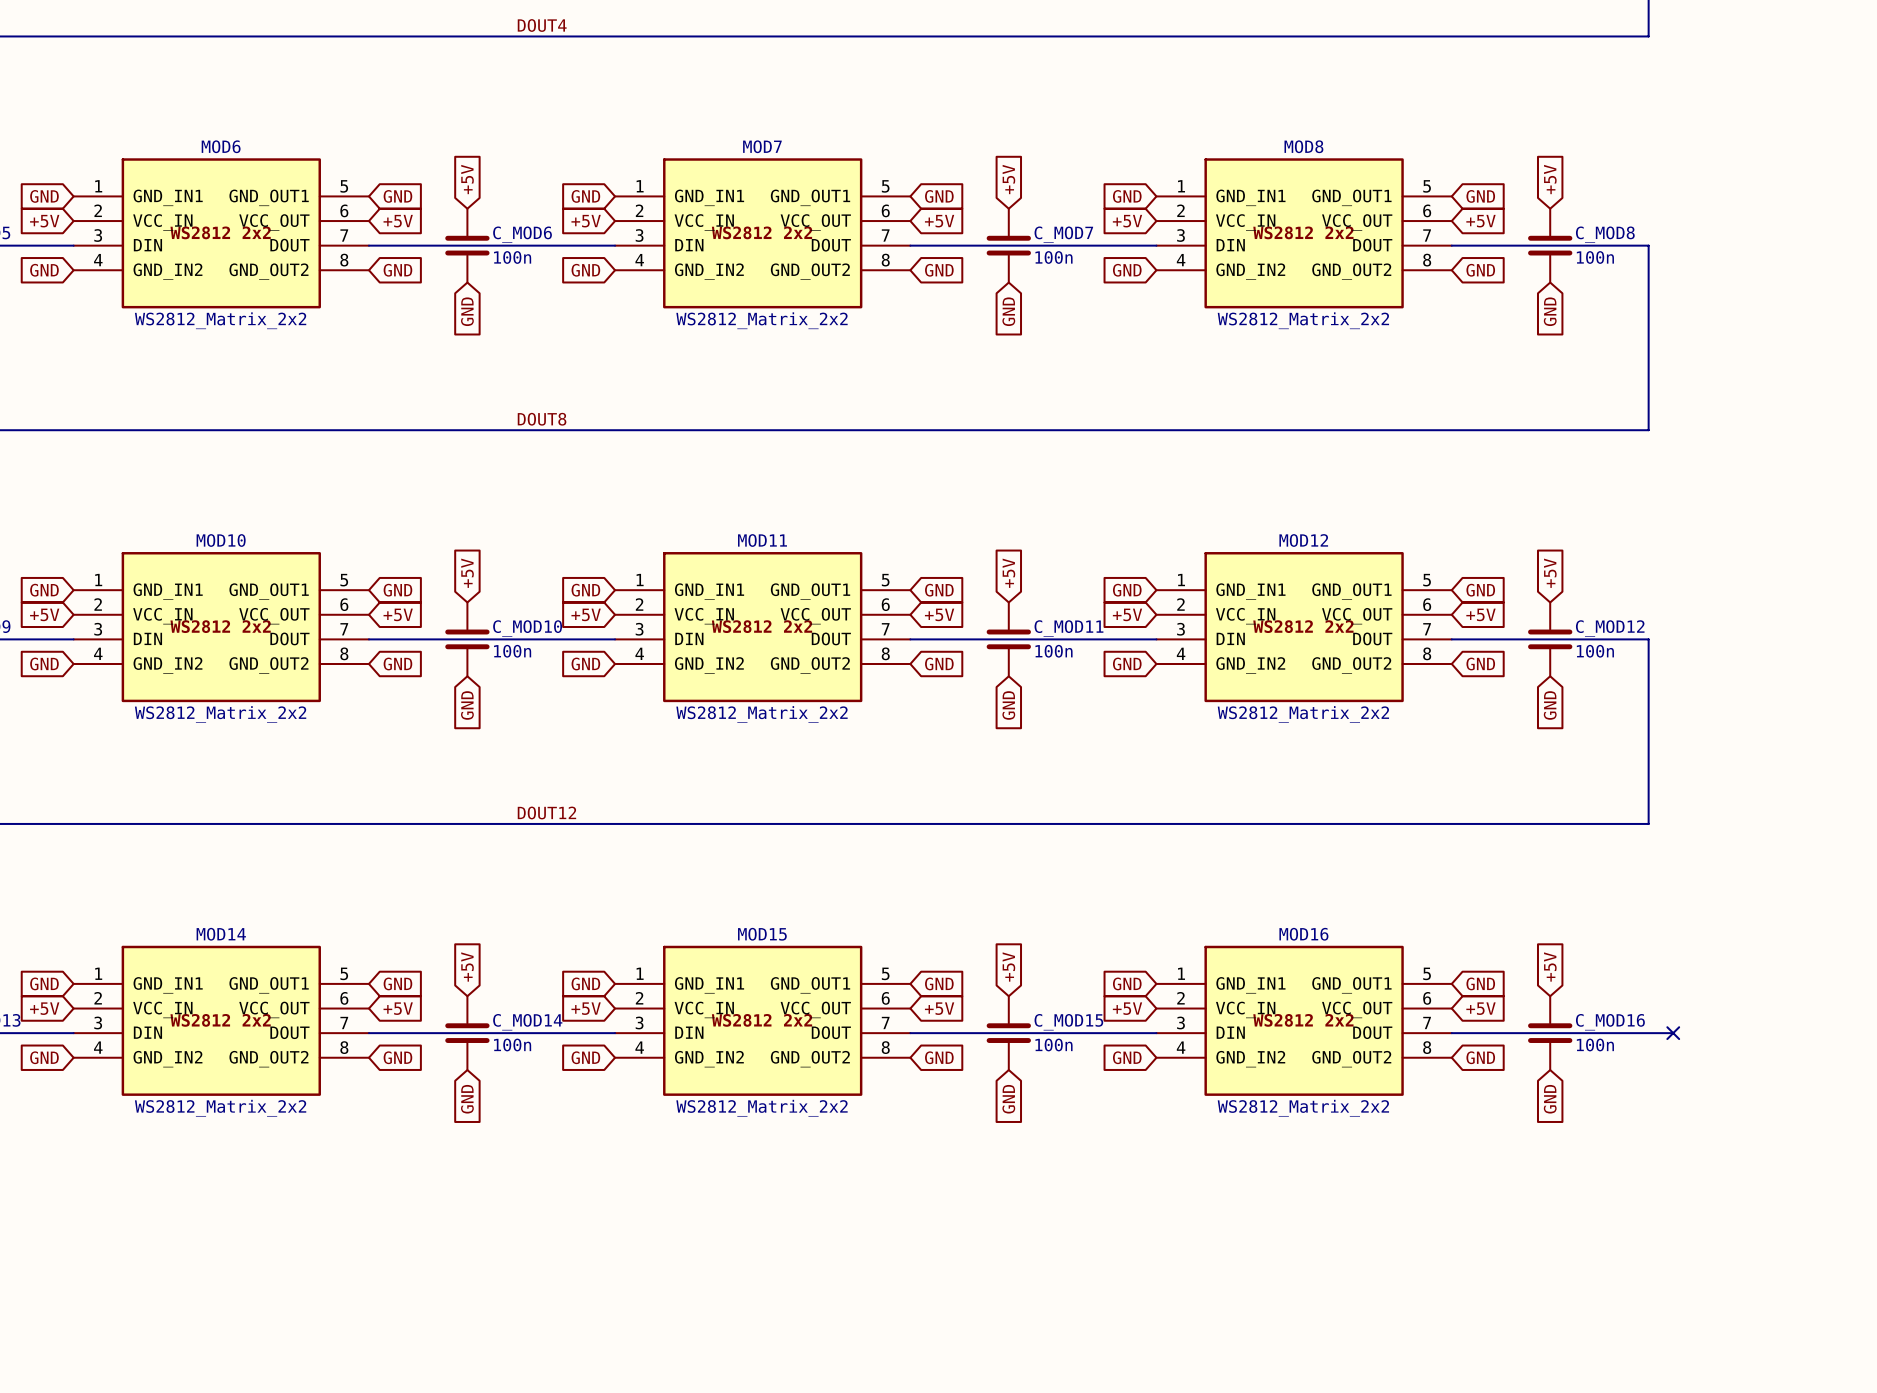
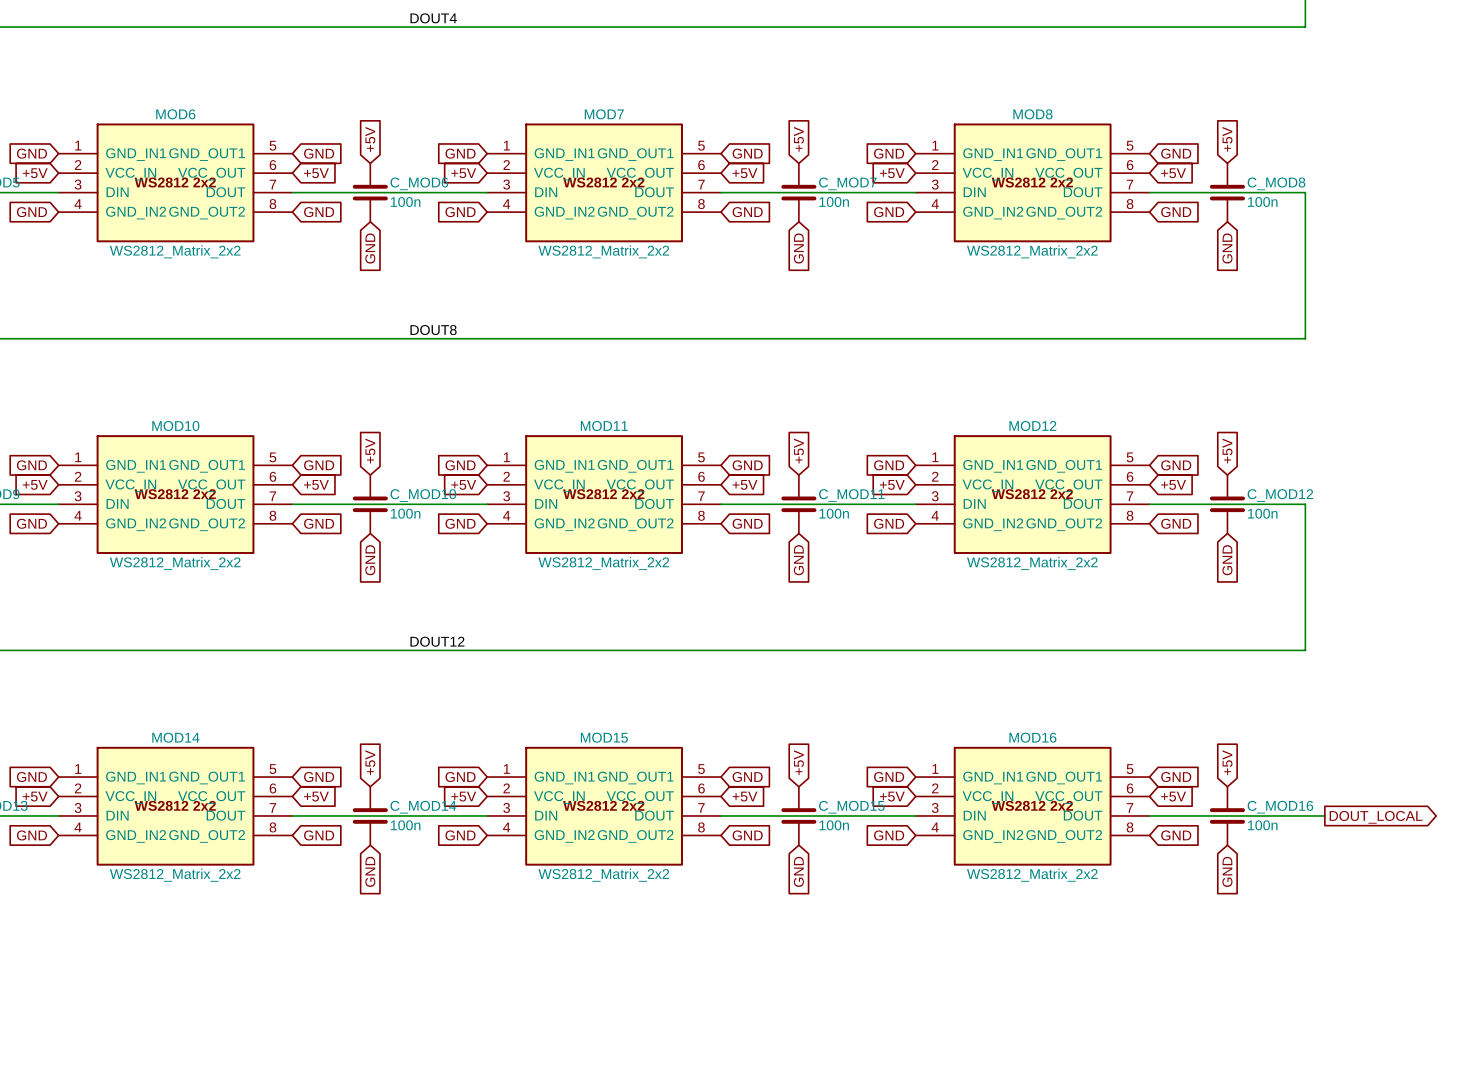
no-connect mark: (1673, 1033) -> none
global label: none -> DOUT_LOCAL (1376, 817)

